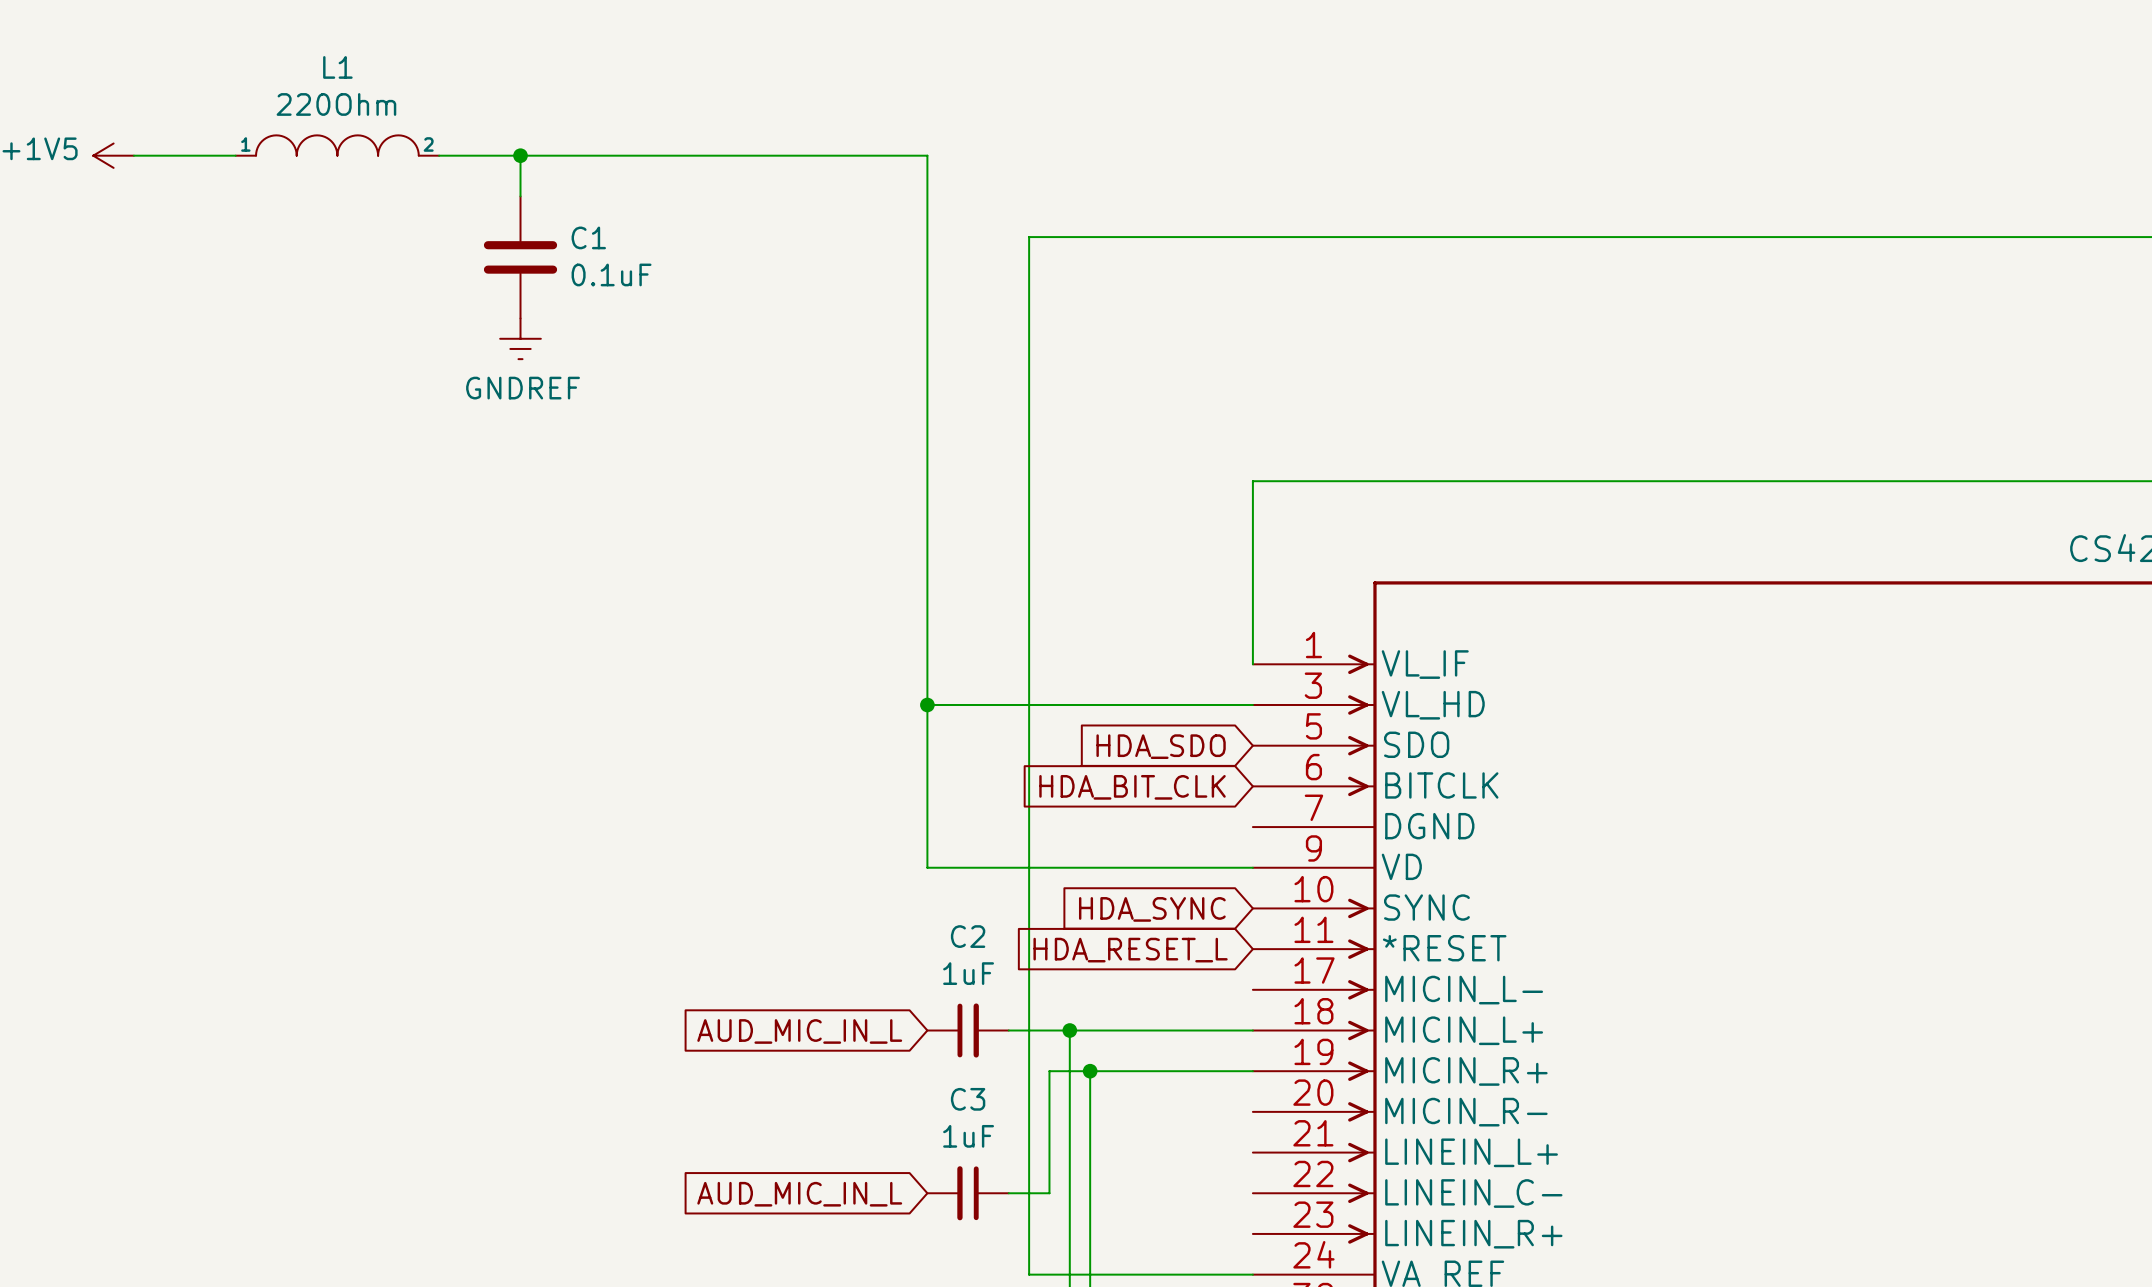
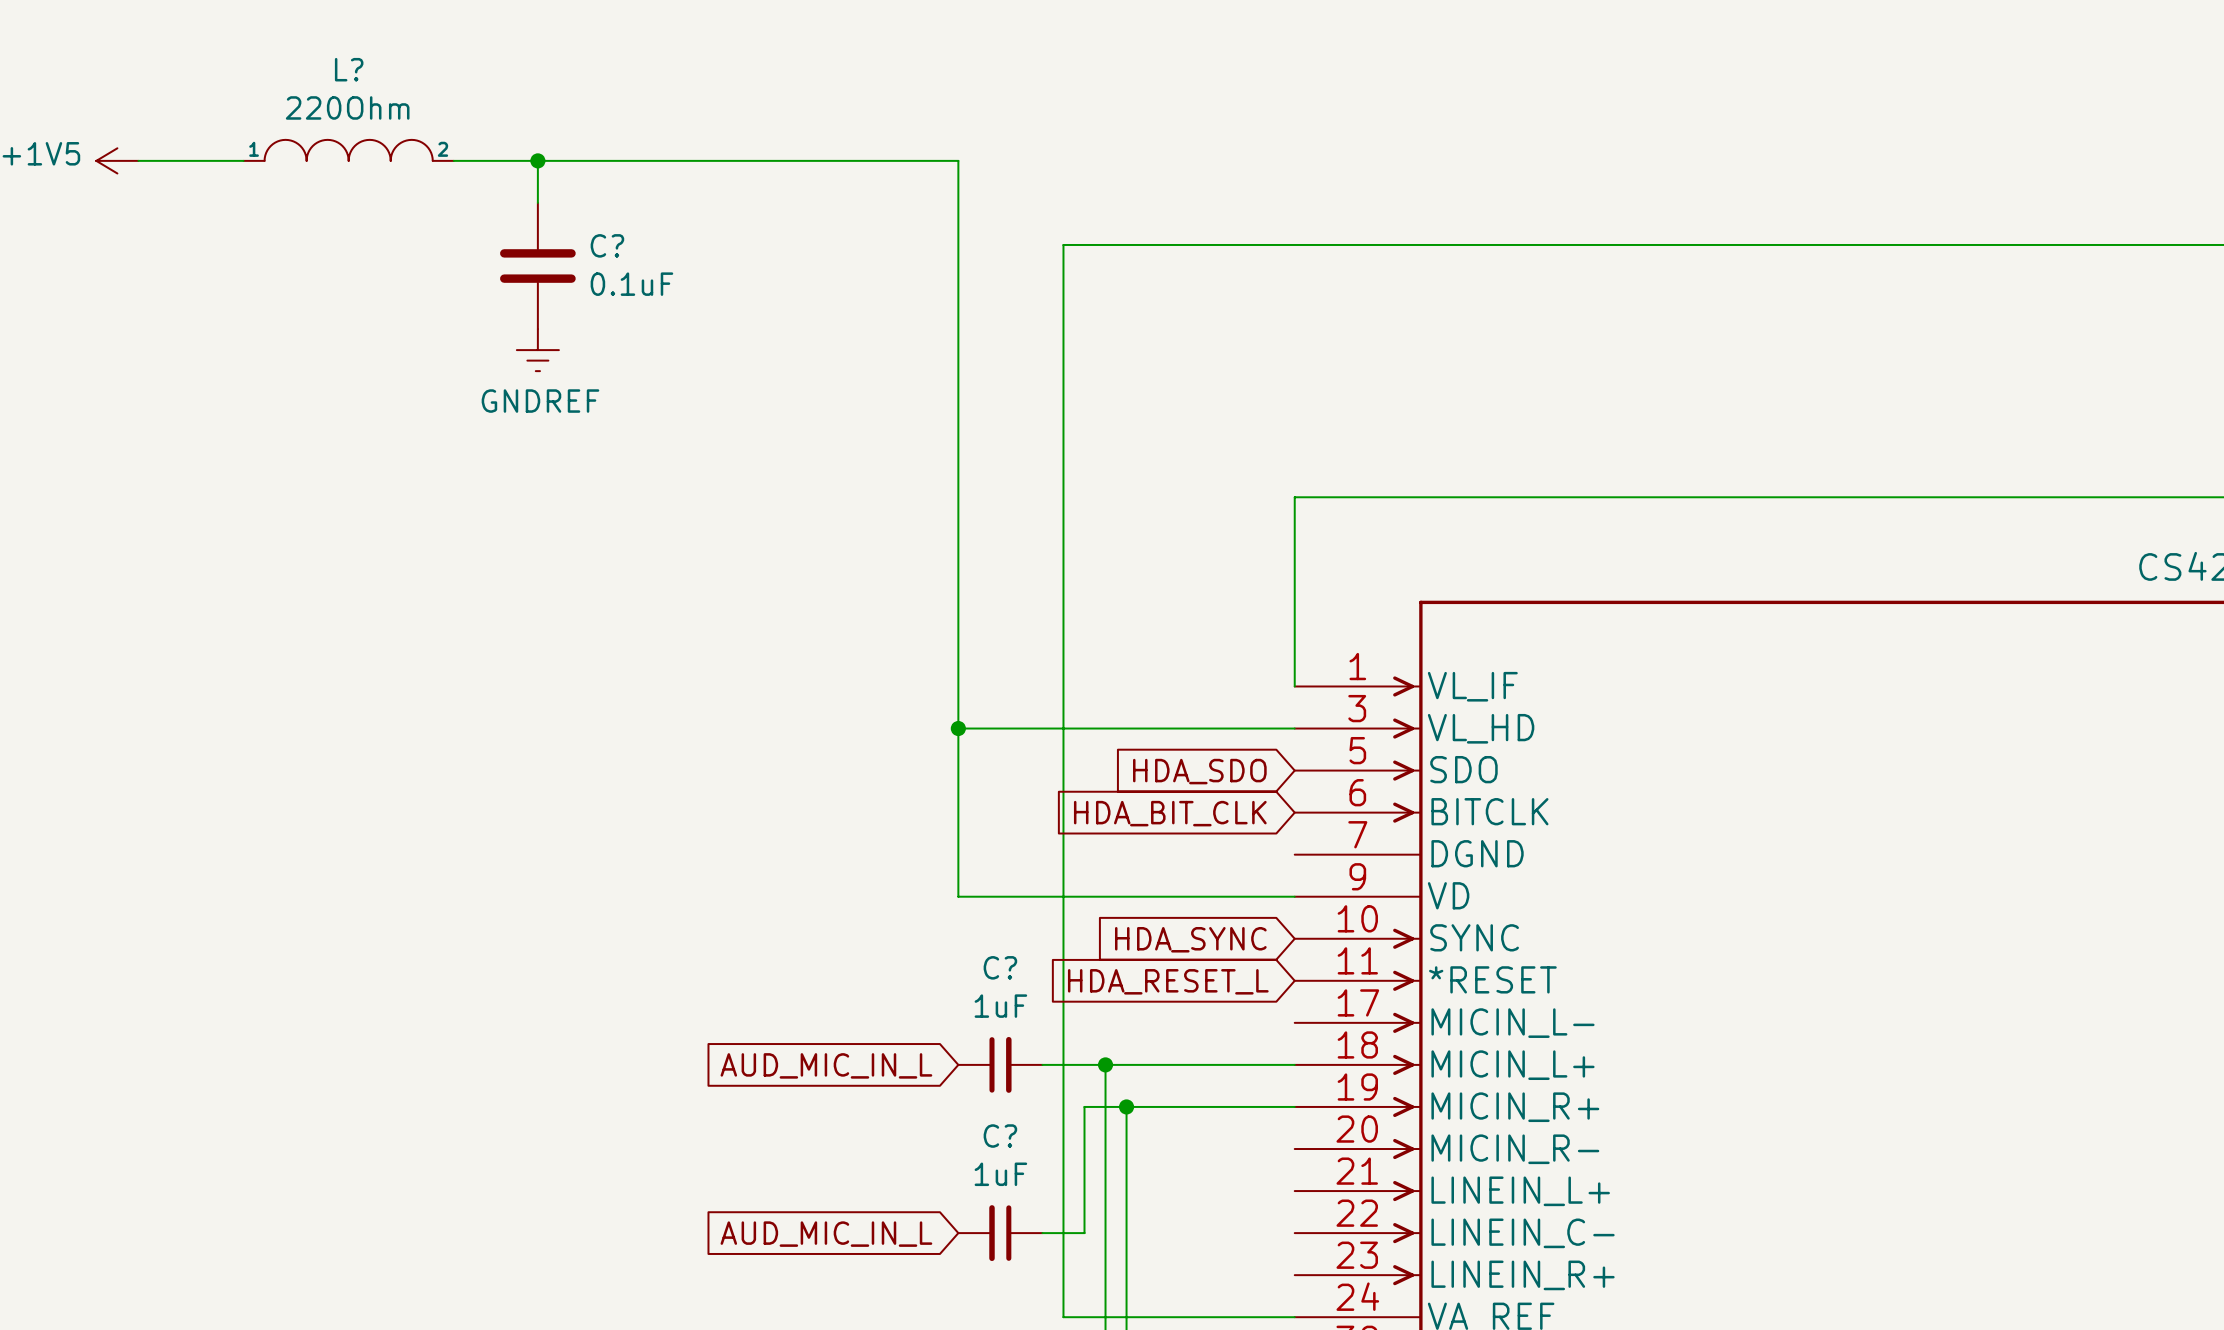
L1 name: L1 (337, 67) -> L? (349, 69)
C1 name: C1 (588, 237) -> C? (607, 245)
C2 name: C2 (968, 936) -> C? (1000, 967)
C3 name: C3 (968, 1099) -> C? (1000, 1136)

